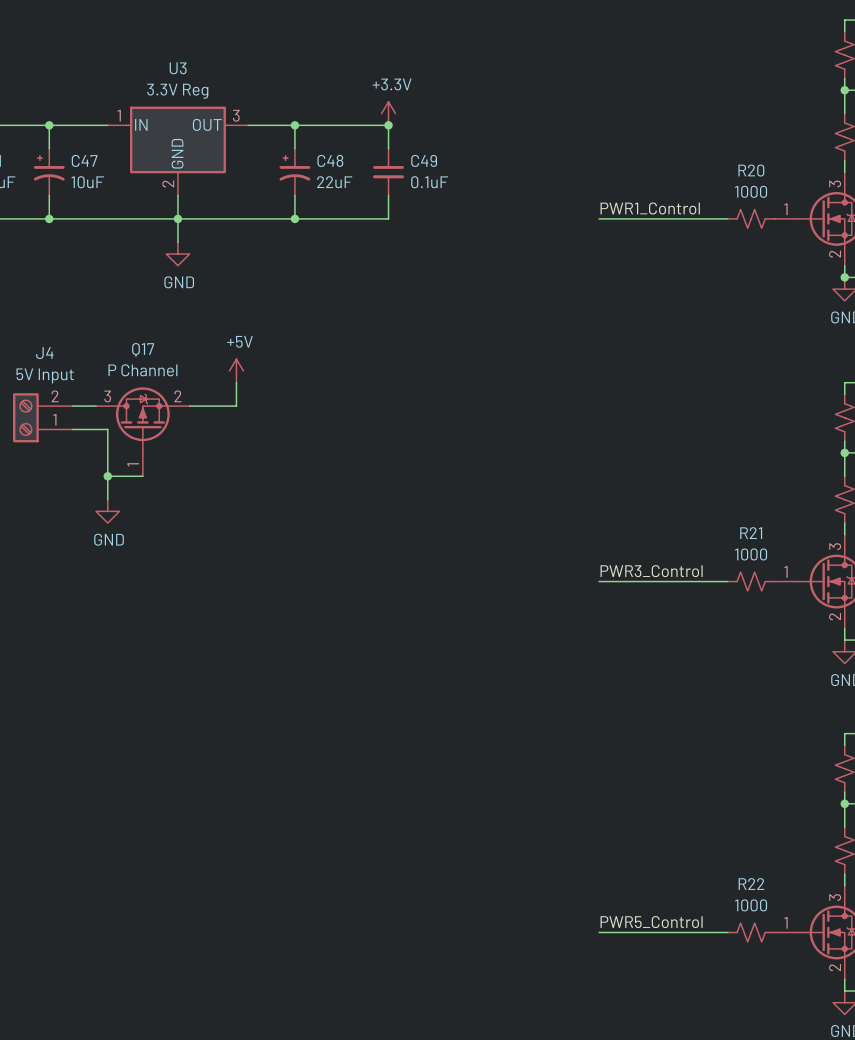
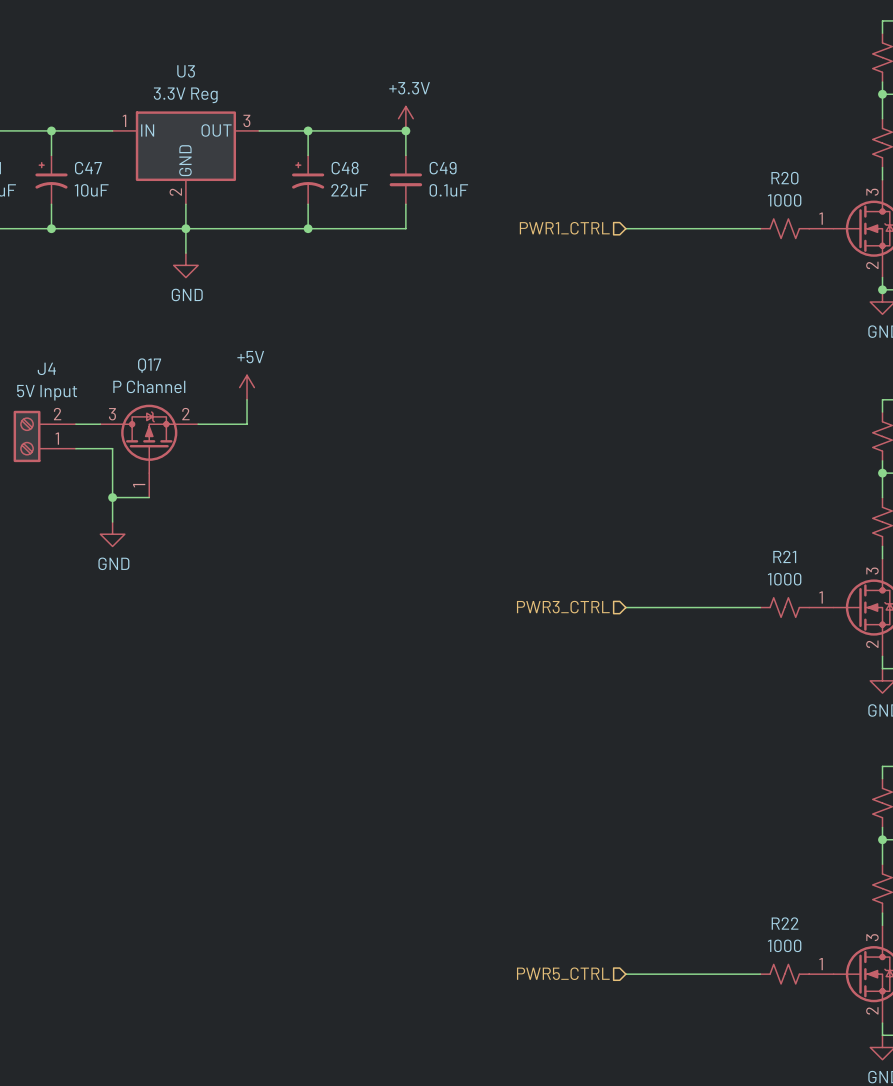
label: PWR1_Control (650, 208) -> none
hierarchical label: none -> PWR1_CTRL (564, 228)
label: PWR3_Control (651, 571) -> none
hierarchical label: none -> PWR3_CTRL (563, 607)
label: PWR5_Control (651, 922) -> none
hierarchical label: none -> PWR5_CTRL (563, 973)

